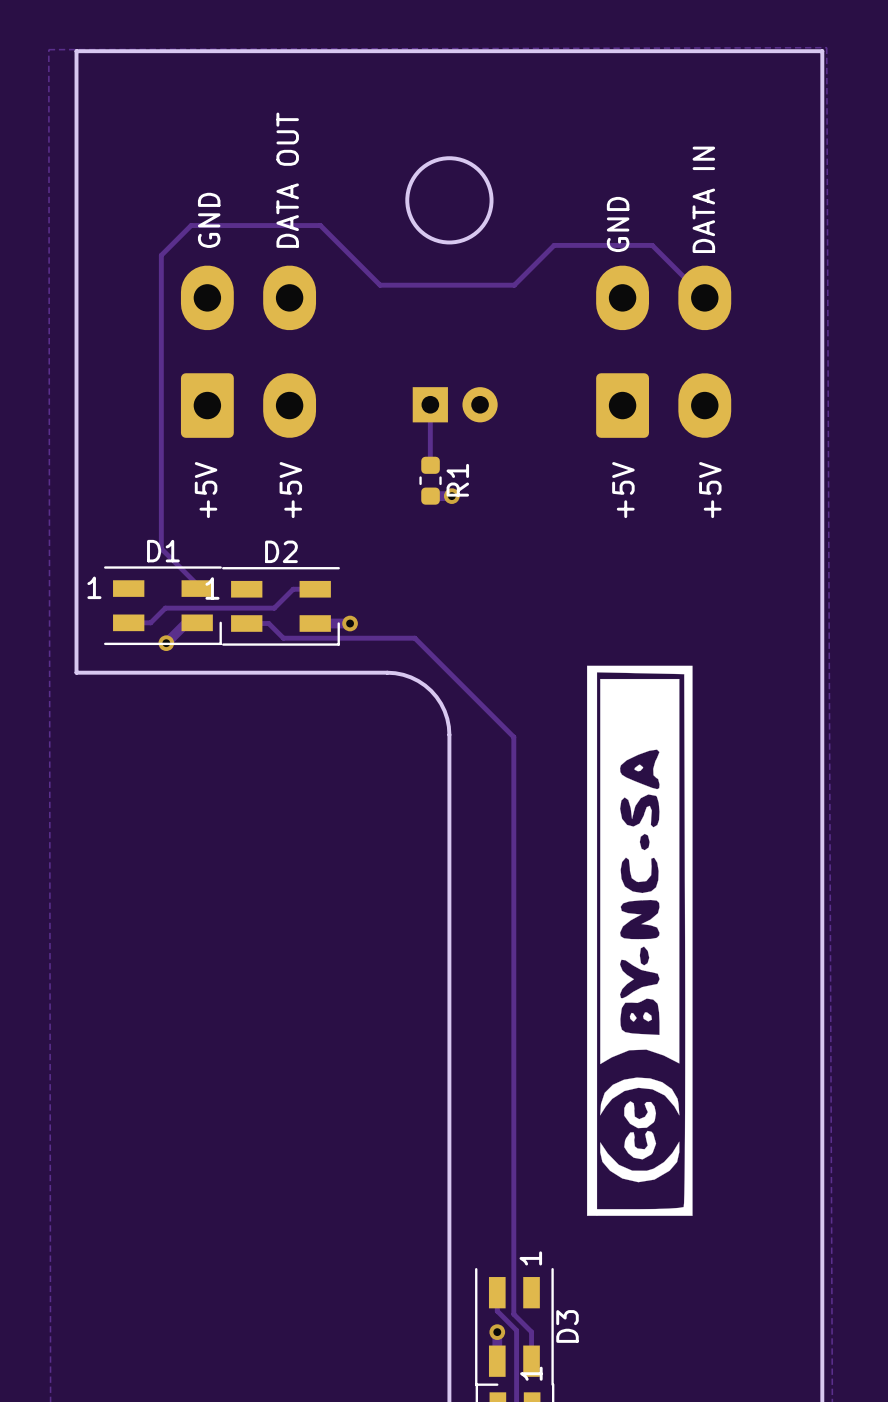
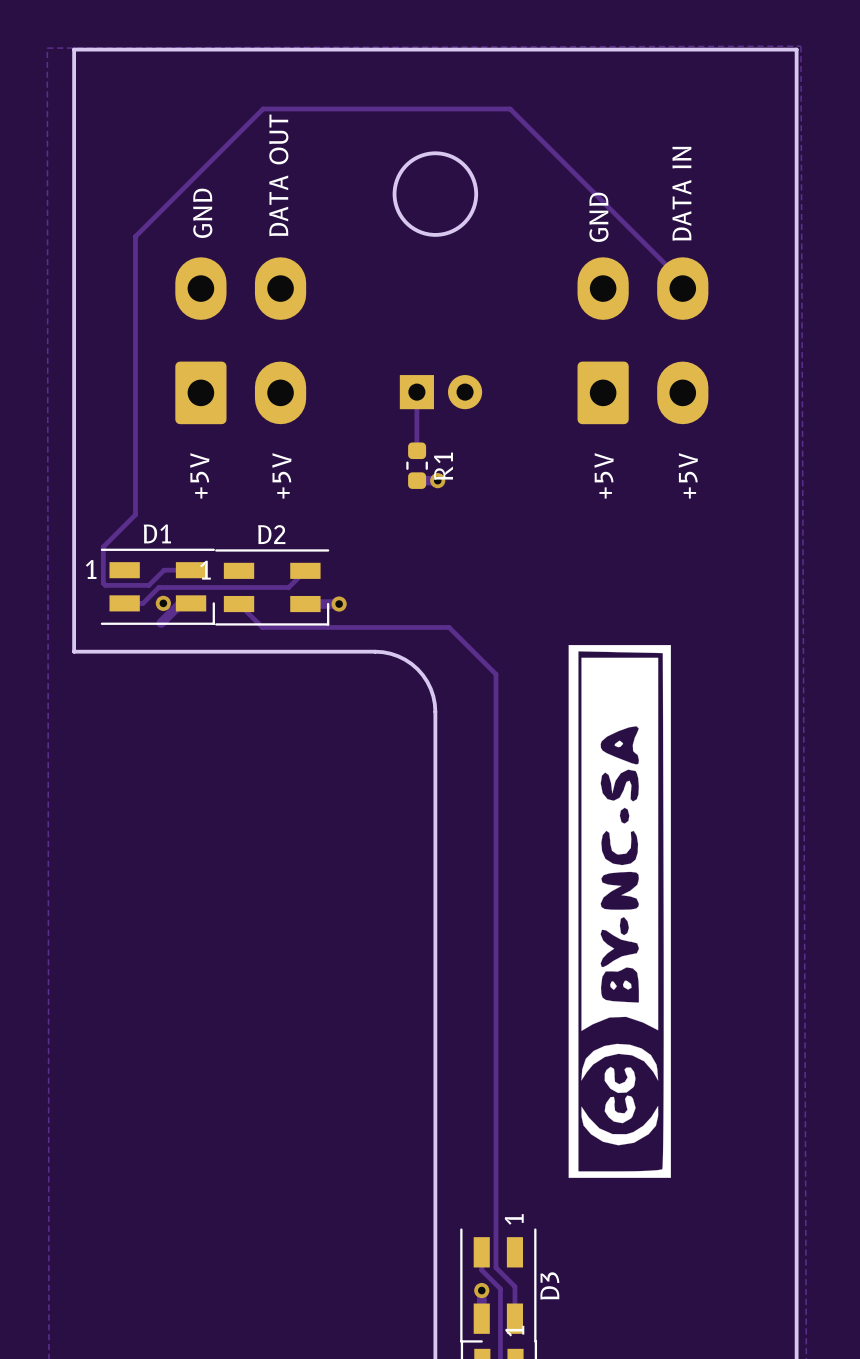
track: (704, 297) (652, 245) (554, 245) (514, 285) (380, 285) (320, 225) (191, 225) (161, 255) (161, 548) (197, 584) (197, 588) -> (682, 288) (682, 281) (510, 108) (263, 108) (135, 236) (135, 514) (103, 546) (103, 583) (105, 585) (148, 585) (164, 570) (191, 570)
track: (315, 589) (293, 589) (274, 608) (165, 608) (150, 622) (147, 622) -> (305, 570) (288, 587) (158, 587) (143, 603)
track: (246, 623) (268, 623) (283, 638) (414, 638) (513, 737) (513, 1314) (531, 1332) -> (239, 604) (262, 627) (449, 627) (495, 674) (495, 1267) (514, 1286) (514, 1290)
via position: (166, 643) -> (163, 603)

